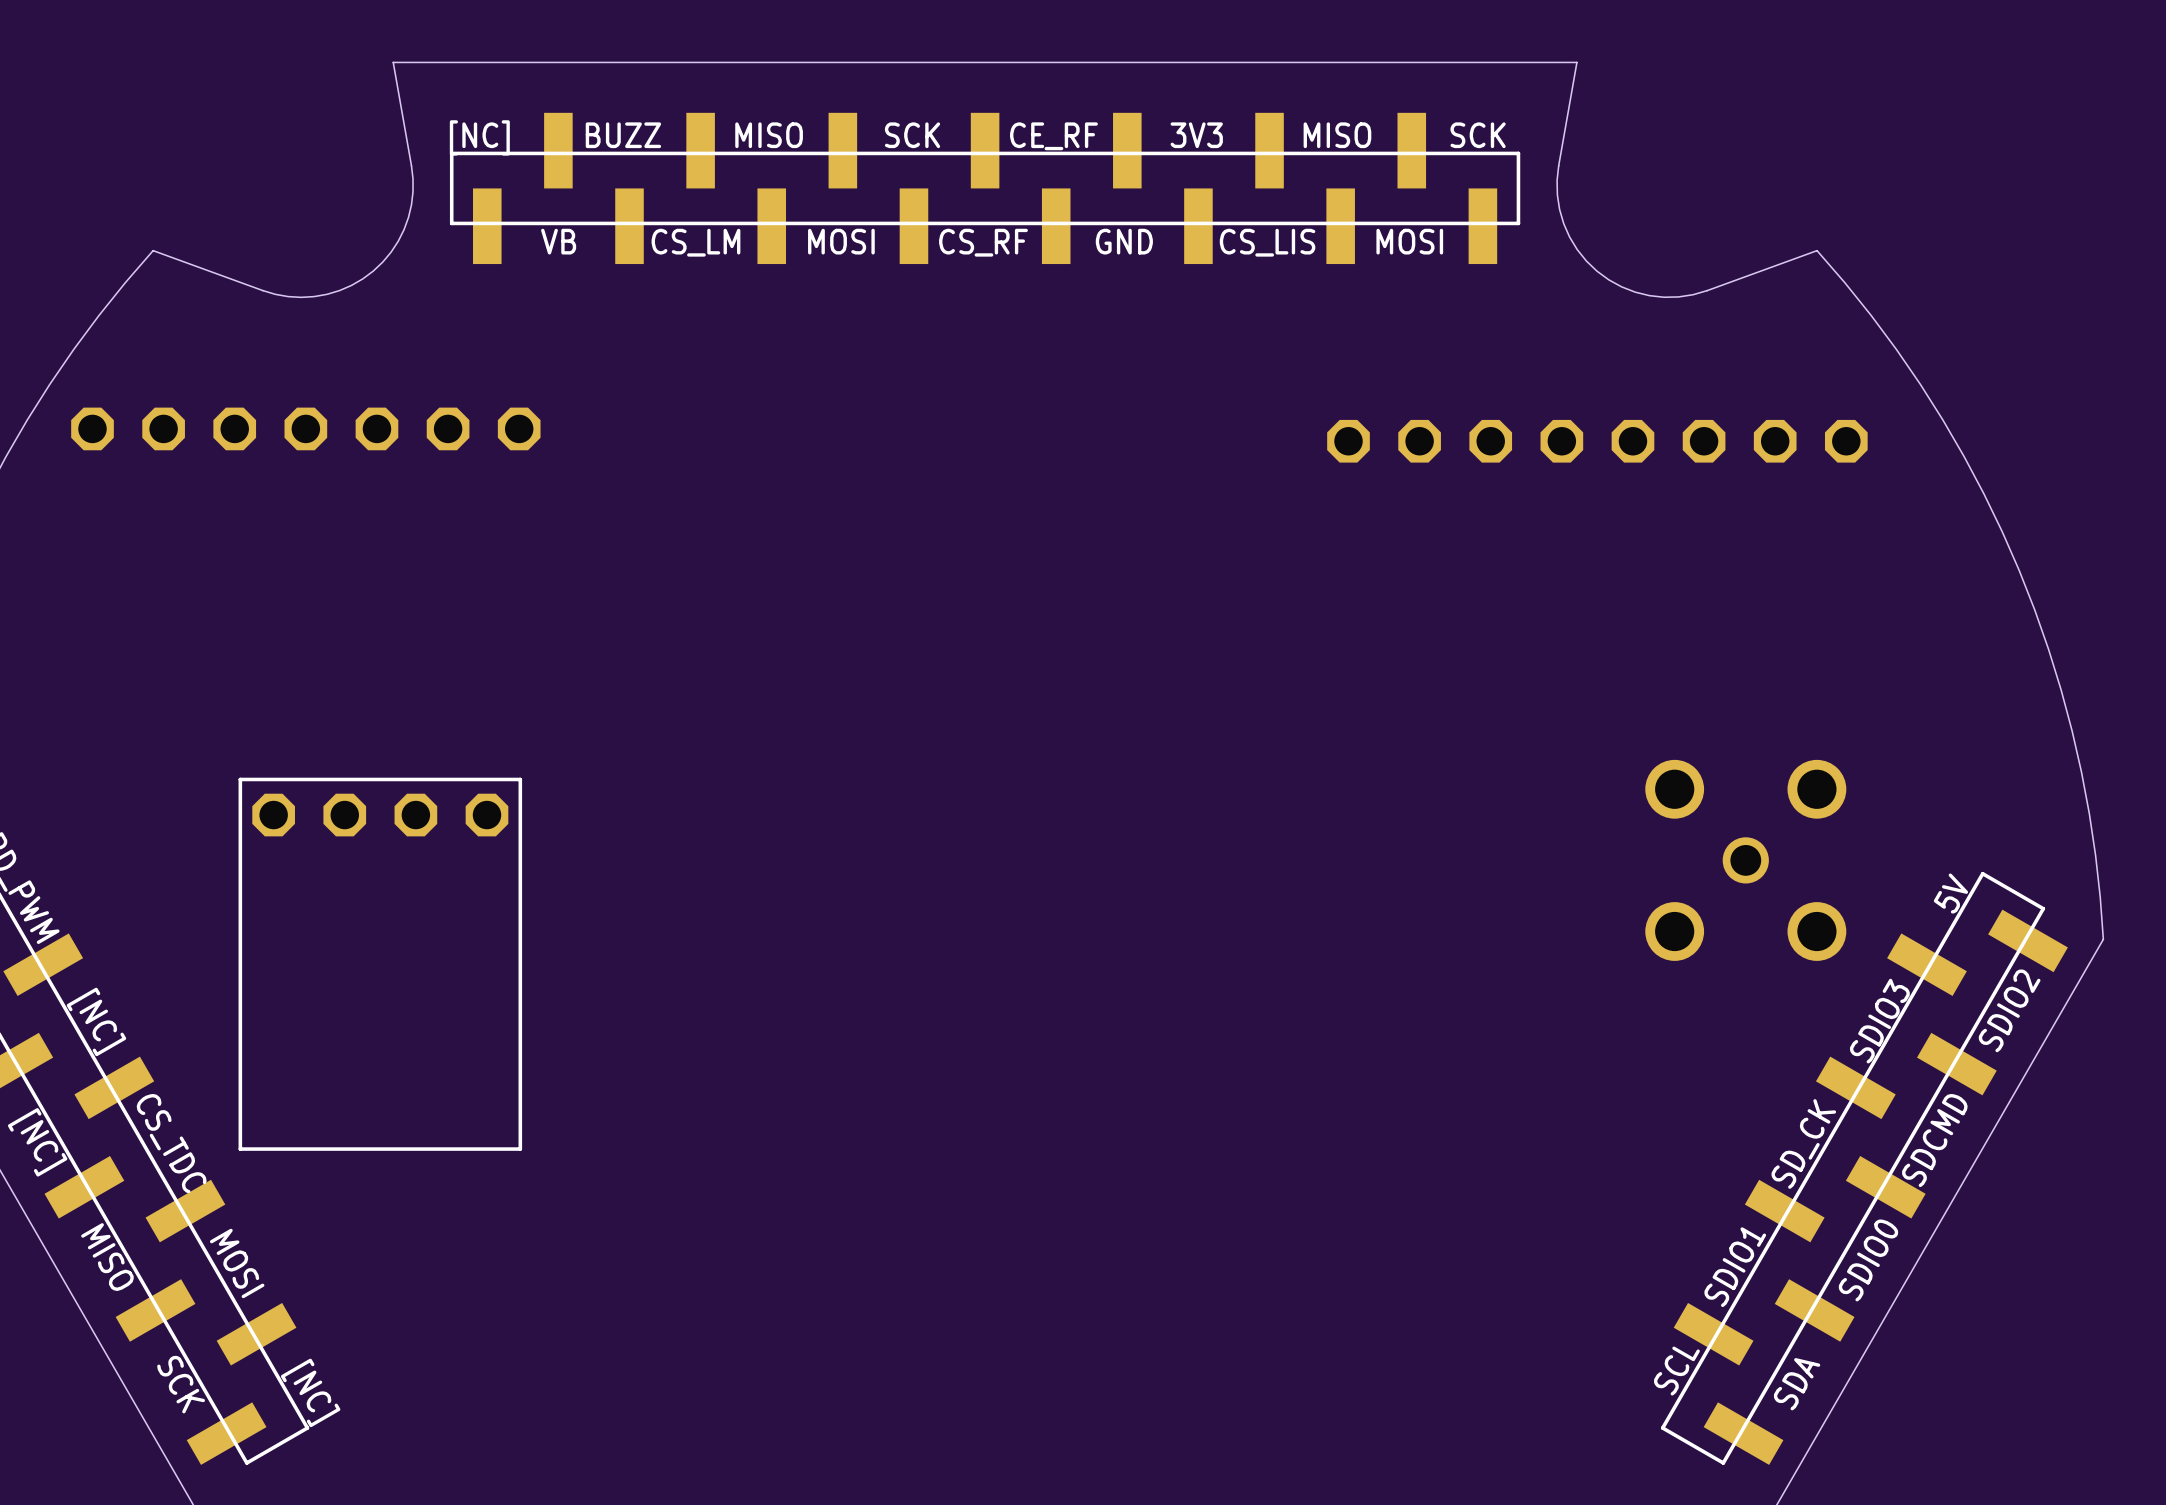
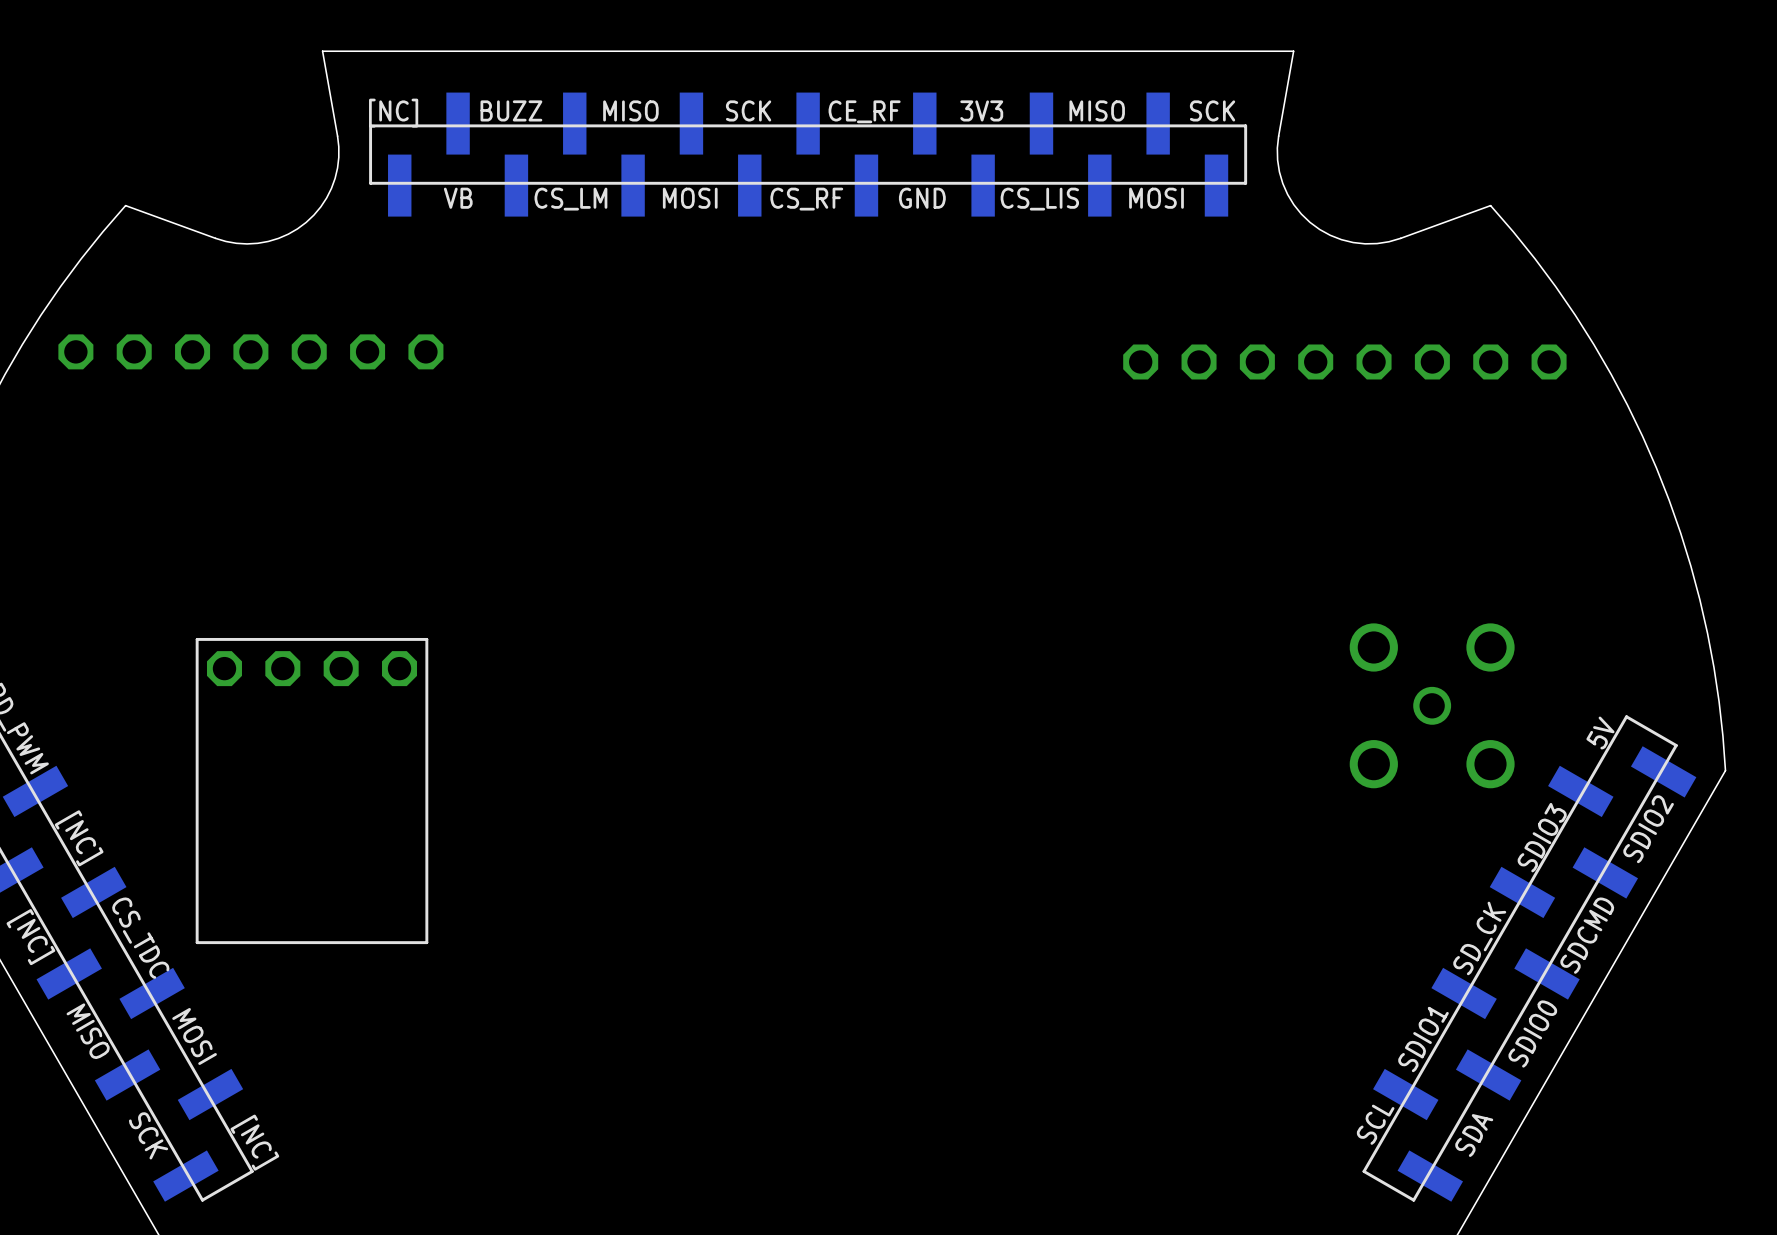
part position: (1597, 441) -> (1344, 361)

